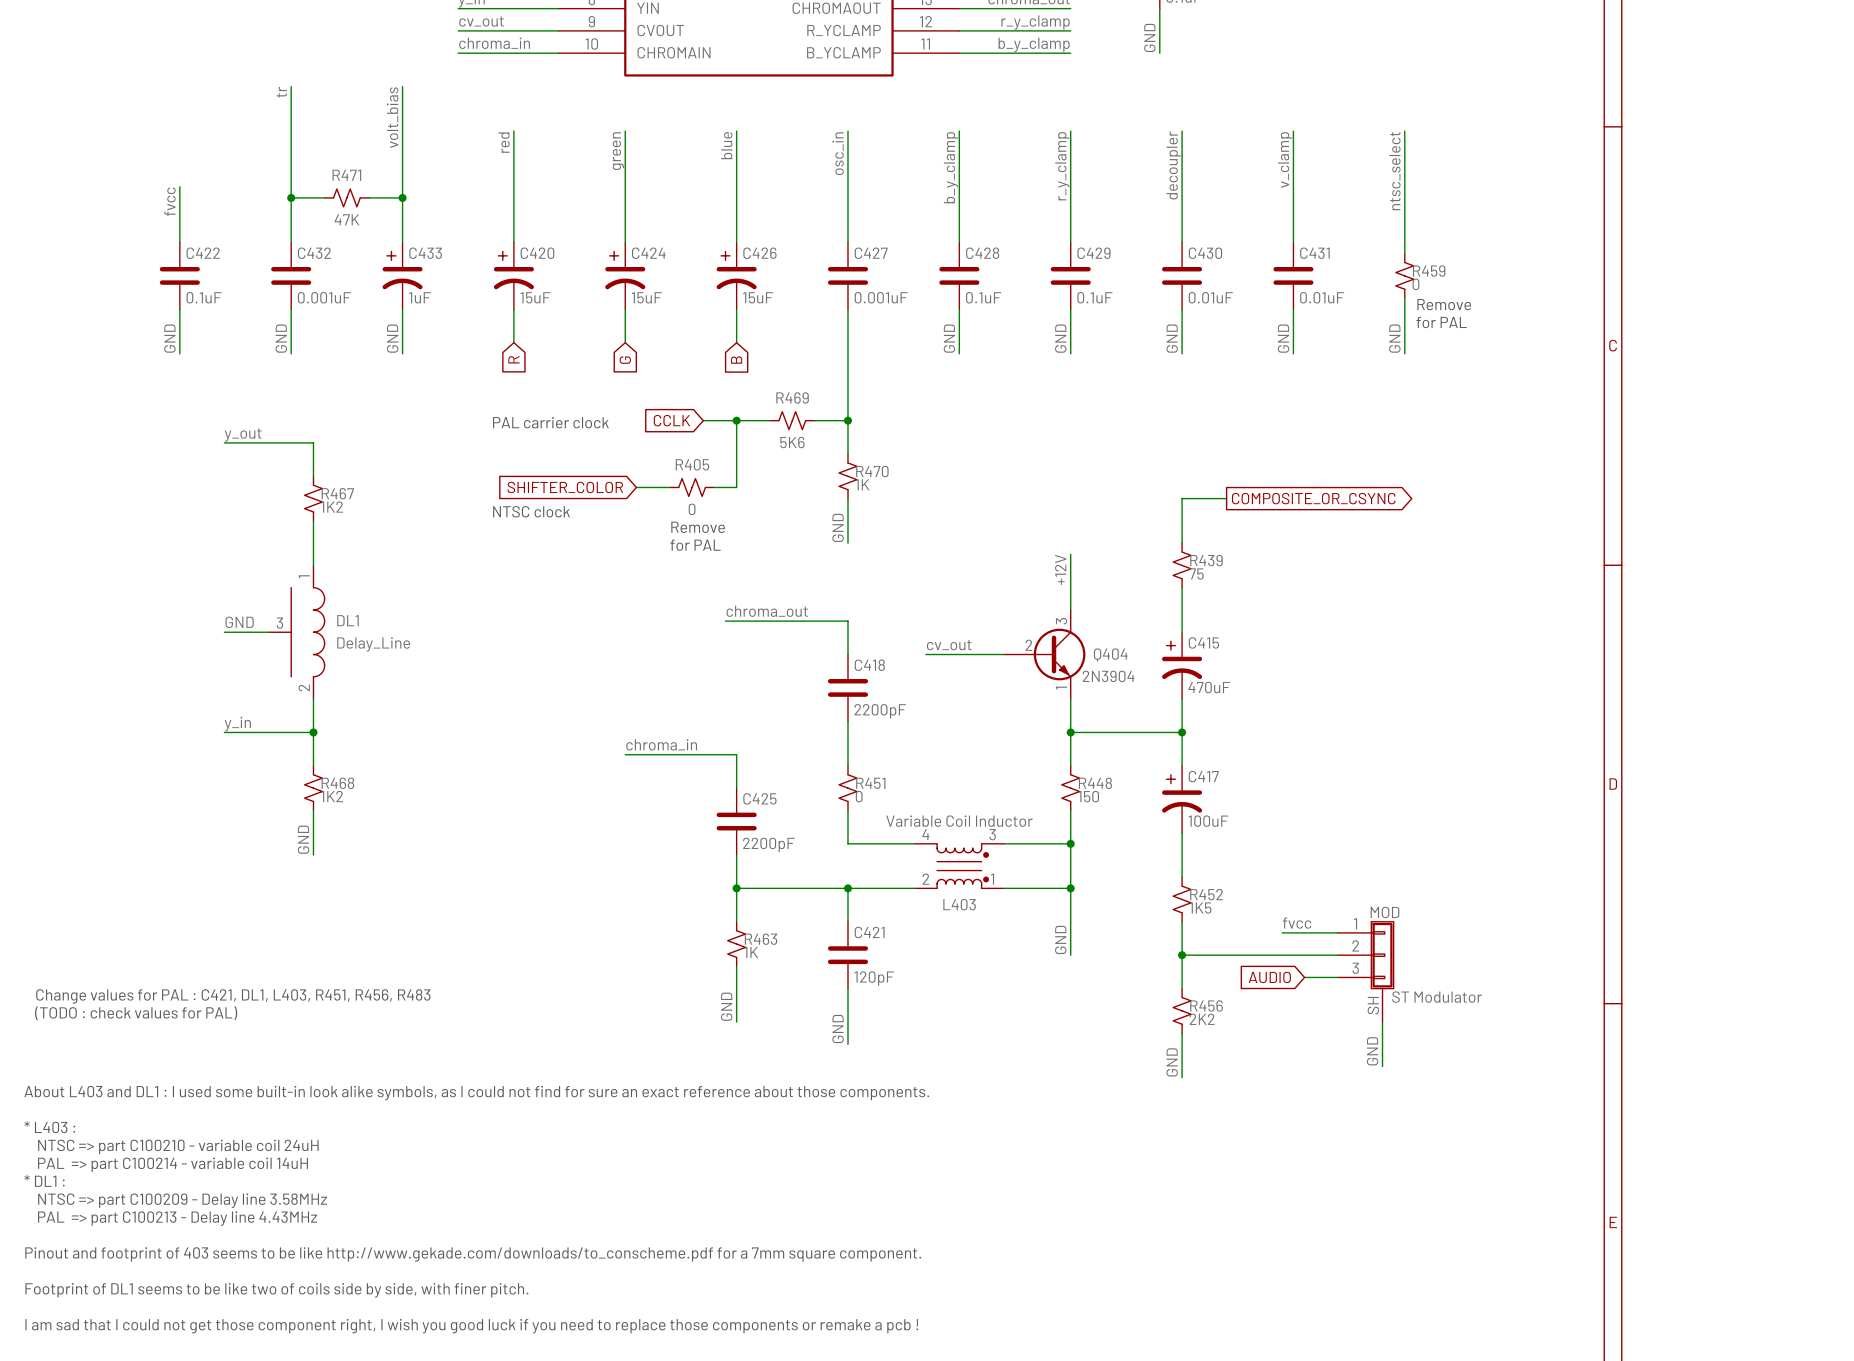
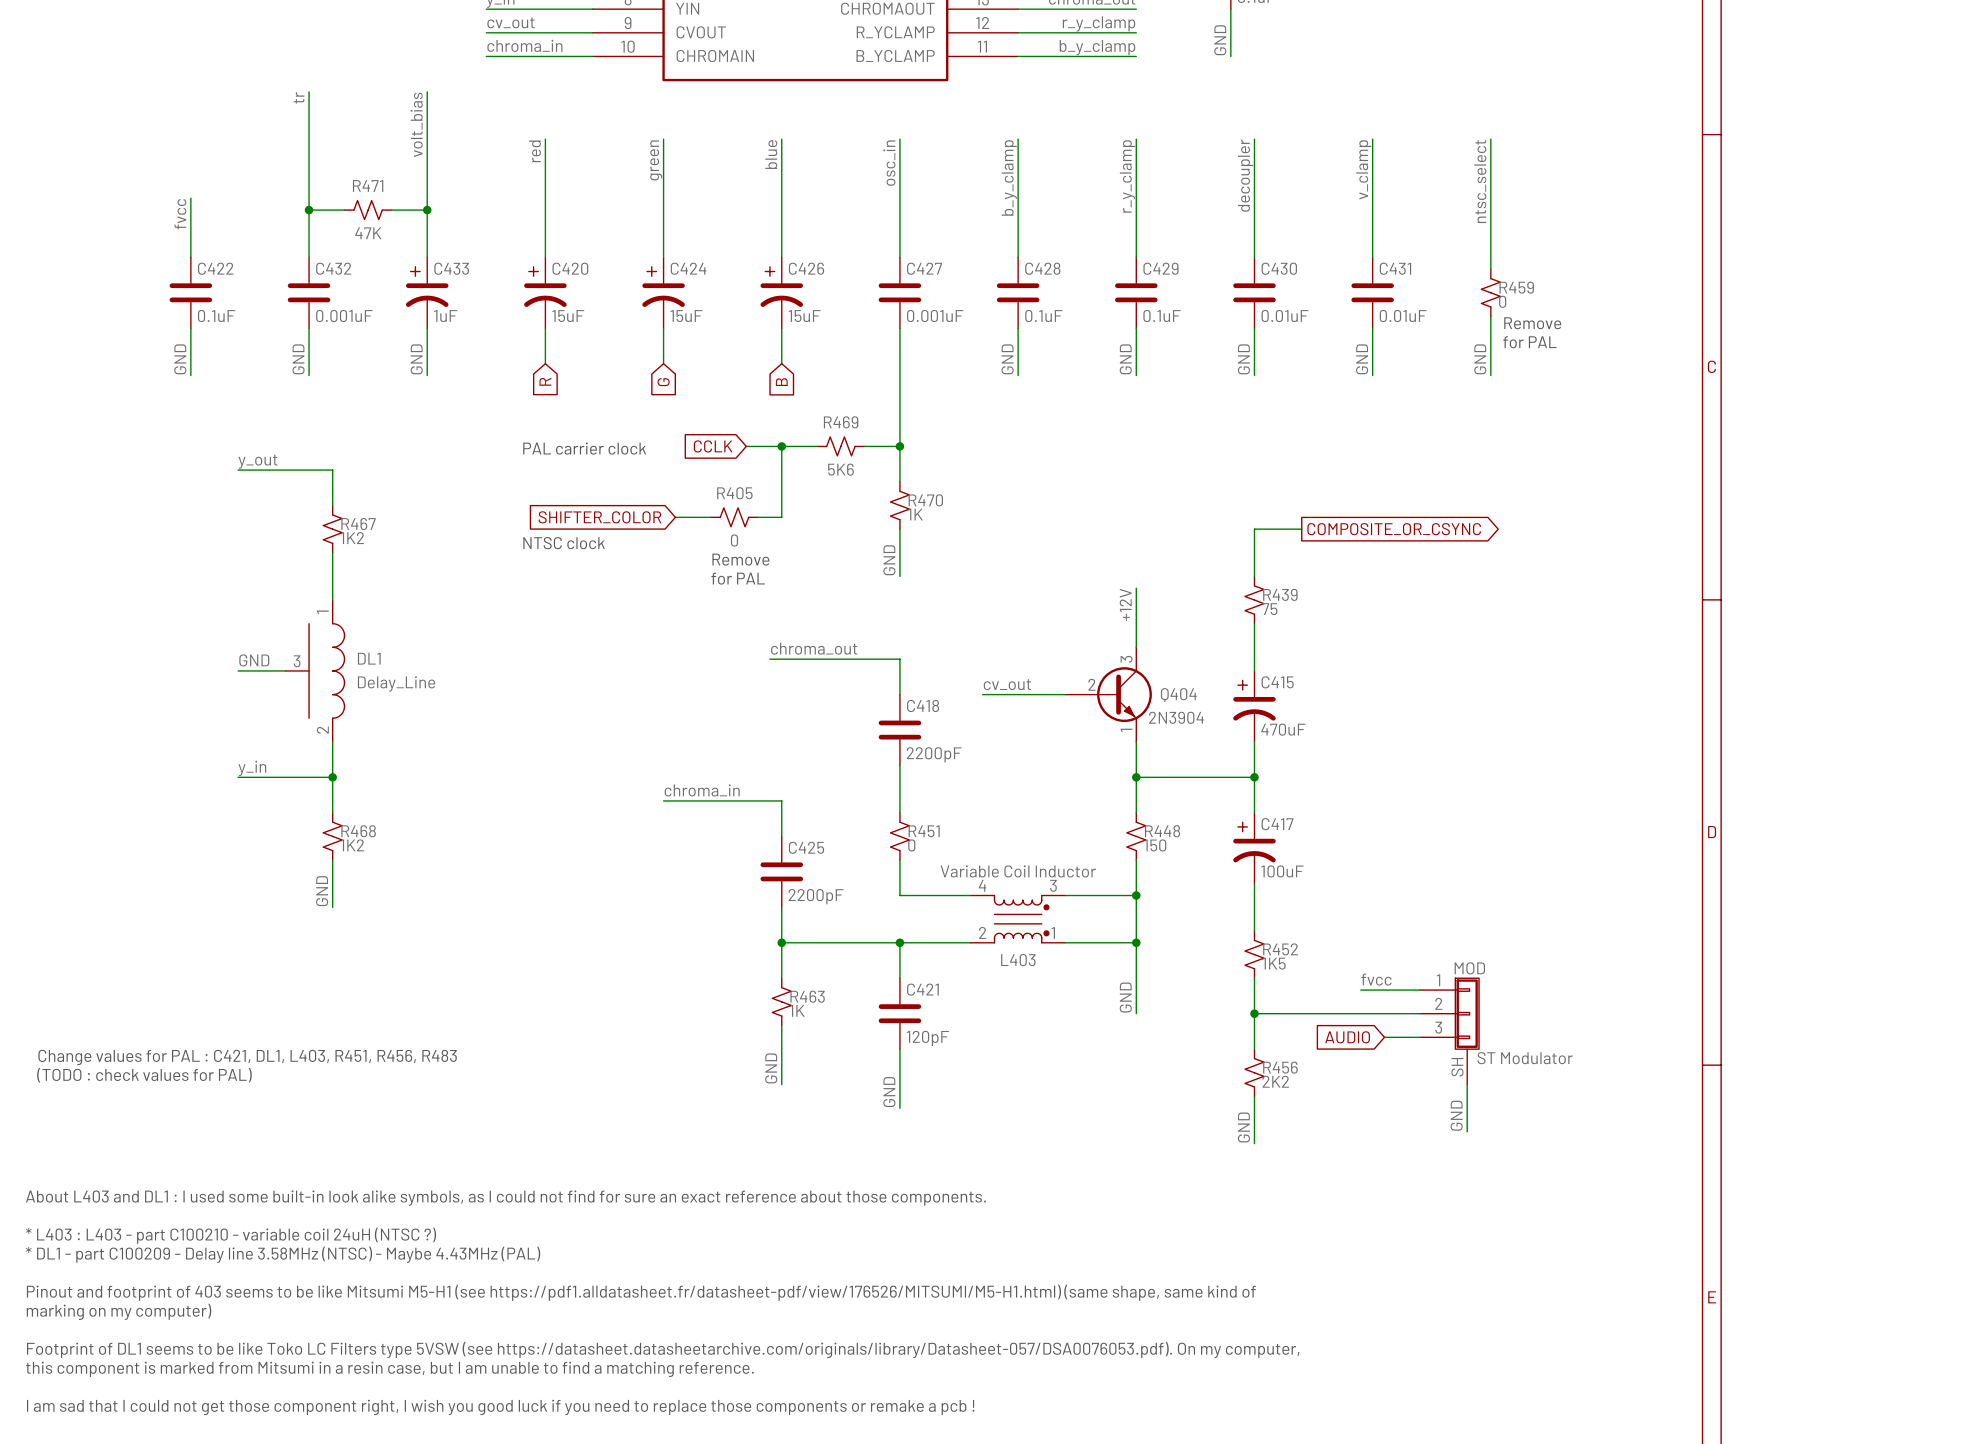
text: About L403 and DL1 : I used some built-in look alike symbols, as I could not find for sure an exact reference about those components. (476, 1093) -> none
text: * L403 : (49, 1127) -> About L403 and DL1 : I used some built-in look alike symbols, as I could not find for sure an exact reference about those components. (505, 1198)
text: NTSC => part C100210 - variable coil 24uH (178, 1146) -> none
text: PAL => part C100214 - variable coil 14uH (172, 1164) -> * L403 : L403 - part C100210 - variable coil 24uH (NTSC ?) (231, 1235)
text: * DL1 : (44, 1180) -> * DL1 - part C100209 - Delay line 3.58MHz (NTSC) - Maybe 4.43MHz (PAL) (283, 1254)
text: NTSC => part C100209 - Delay line 3.58MHz (182, 1200) -> none
text: PAL => part C100213 - Delay line 4.43MHz (177, 1218) -> Pinout and footprint of 403 seems to be like Mitsumi M5-H1 (see https://pdf1.alldatasheet.fr/datasheet-pdf/view/176526/MITSUMI/M5-H1.html) (same shape, same kind of (641, 1292)
text: none -> marking on my computer) (119, 1311)
text: Pinout and footprint of 403 seems to be like http://www.gekade.com/downloads/to_conscheme.pdf for a 7mm square component. (473, 1254) -> none
text: none -> Footprint of DL1 seems to be like Toko LC Filters type 5VSW (see https://datasheet.datasheetarchive.com/originals/library/Datasheet-057/DSA0076053.pdf). On my computer, (663, 1349)
text: Footprint of DL1 seems to be like two of coils side by side, with finer pitch. (276, 1290) -> this component is marked from Mitsumi in a resin case, but I am unable to find a matching reference. (389, 1369)

